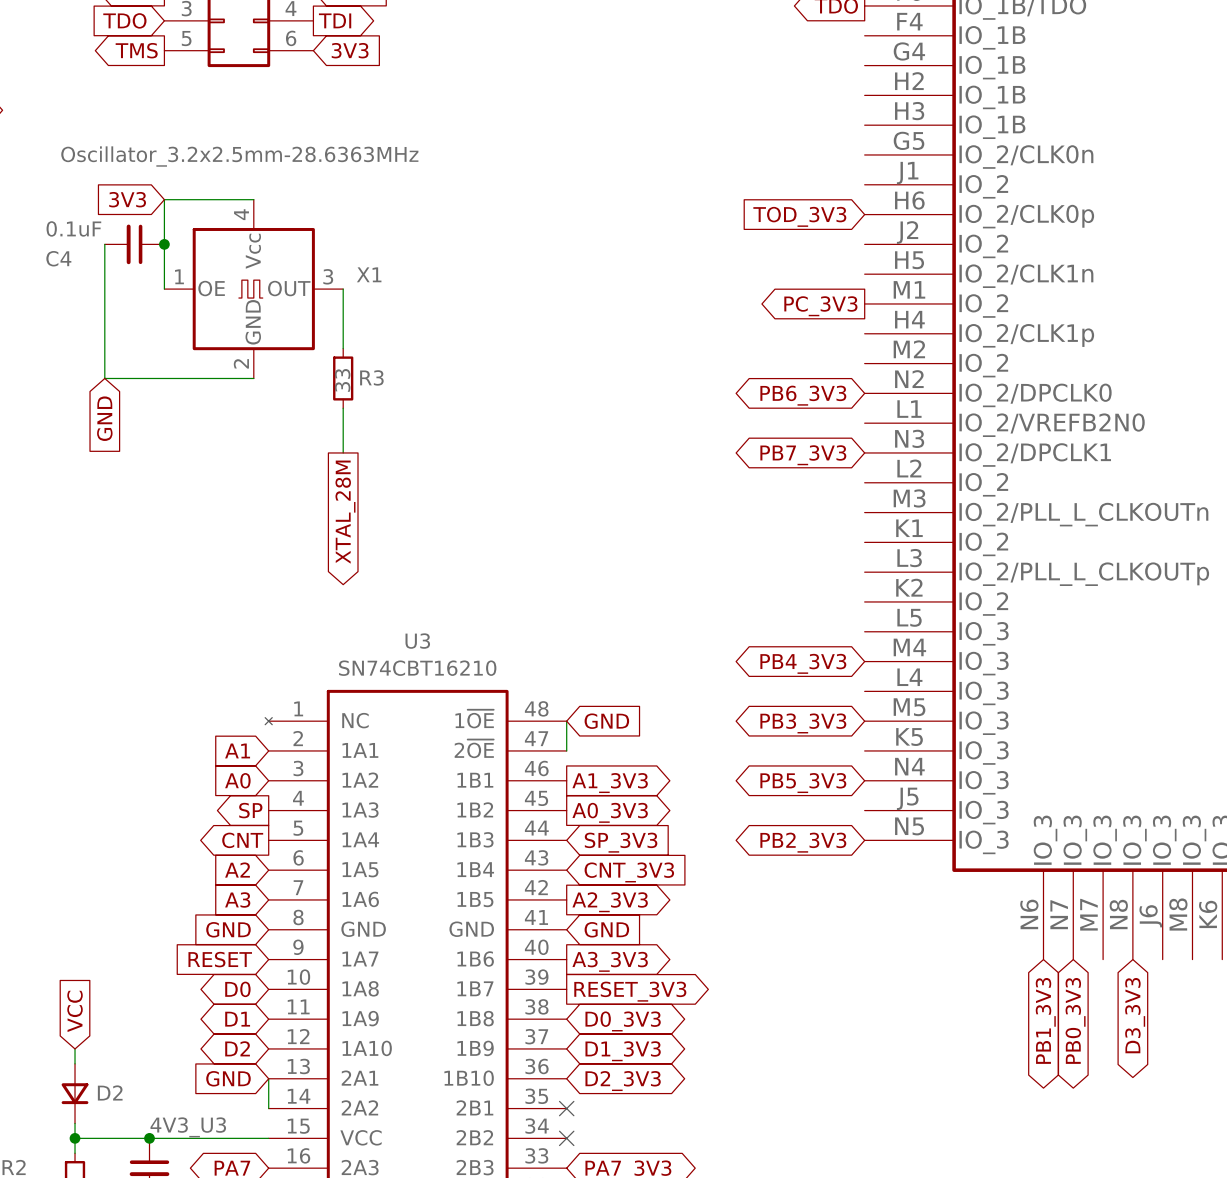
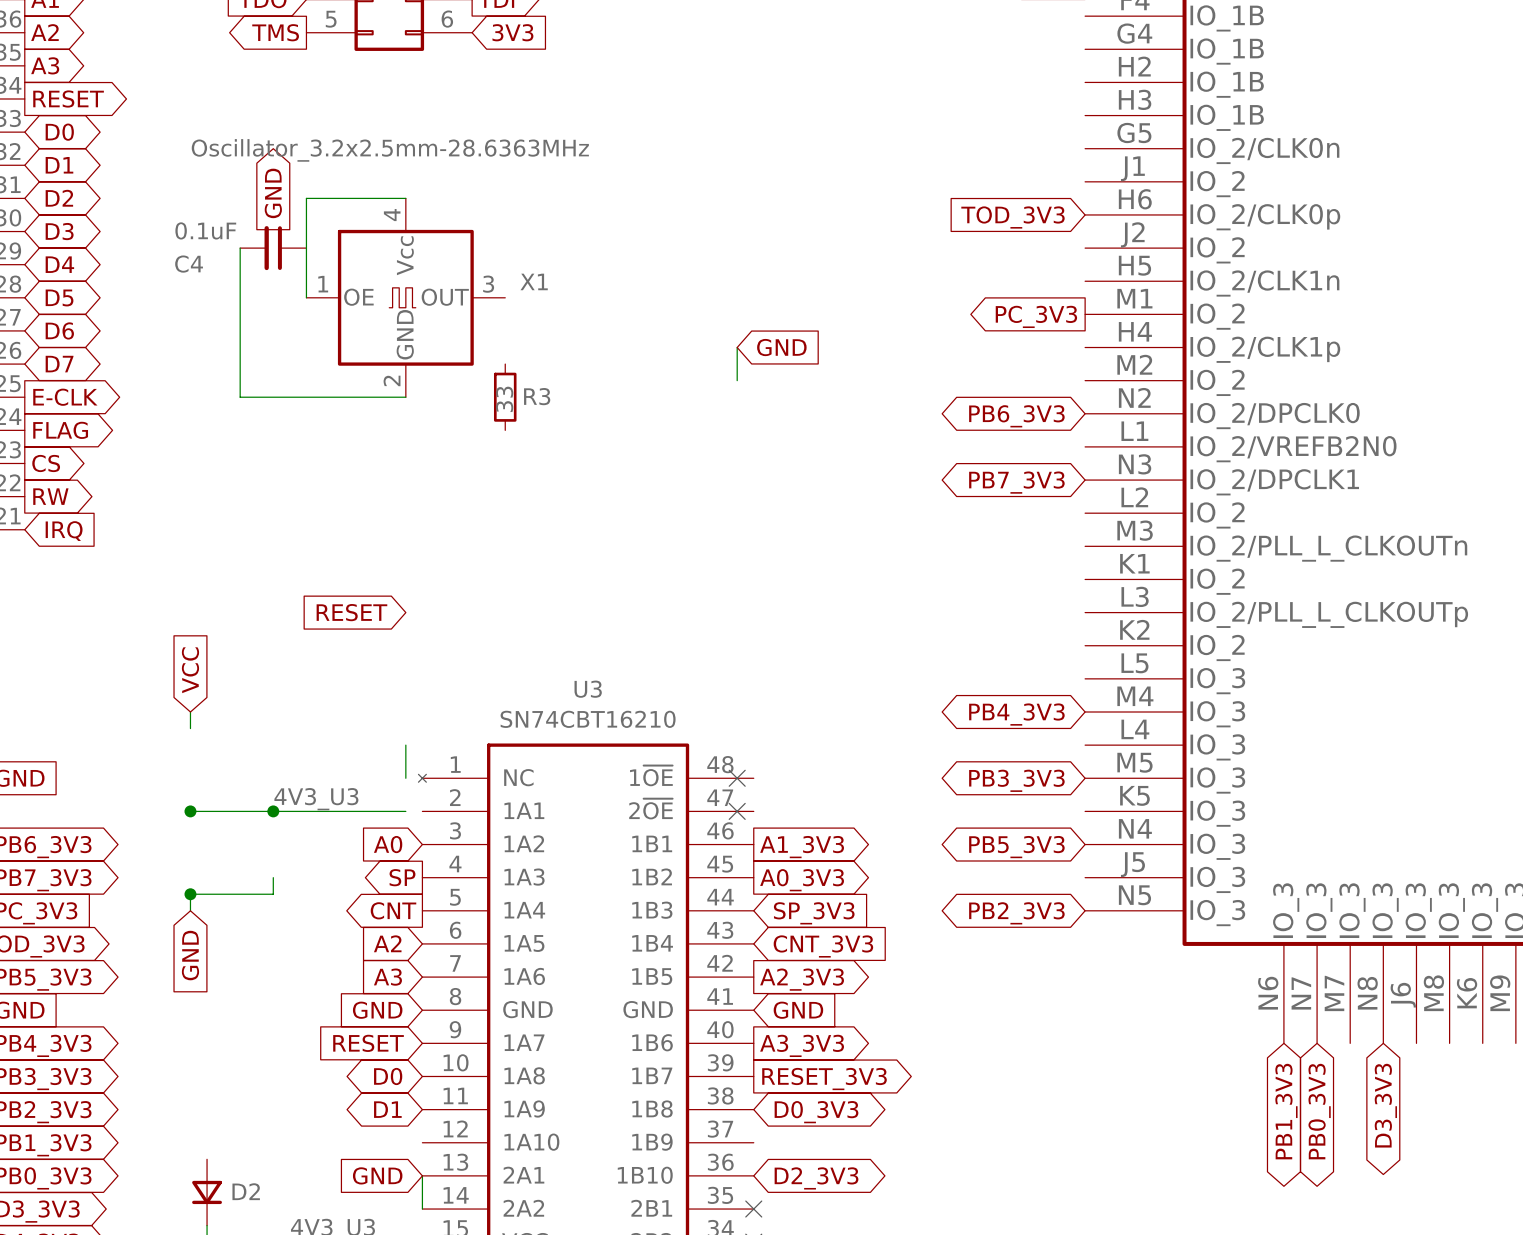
global label: none -> GND (273, 193)
global label: 3V3 (127, 199) -> none
junction: (164, 244) -> none
wire: (343, 289) (343, 348) -> none
wire: none -> (737, 347) (737, 380)
global label: none -> GND (781, 347)
wire: (343, 408) (343, 452) -> none
global label: GND (104, 418) -> none
global label: XTAL_28M (345, 512) -> none
global label: none -> RESET (351, 612)
global label: none -> VCC (190, 670)
wire: none -> (190, 712) (190, 728)
wire: none -> (405, 745) (405, 778)
no-connect mark: none -> (737, 778)
wire: (566, 721) (566, 750) -> none
global label: GND (606, 721) -> none
label: none -> 4V3_U3 (316, 799)
wire: none -> (190, 811) (405, 811)
junction: none -> (190, 811)
junction: none -> (273, 811)
global label: A1 (237, 750) -> none
no-connect mark: none -> (737, 811)
wire: none -> (273, 877) (273, 894) (190, 894) (190, 910)
junction: none -> (190, 894)
global label: none -> GND (190, 955)
global label: VCC (75, 1011) -> none
wire: (75, 1048) (75, 1063) -> none
global label: D2 (237, 1048) -> none
global label: D1_3V3 (623, 1051) -> none

